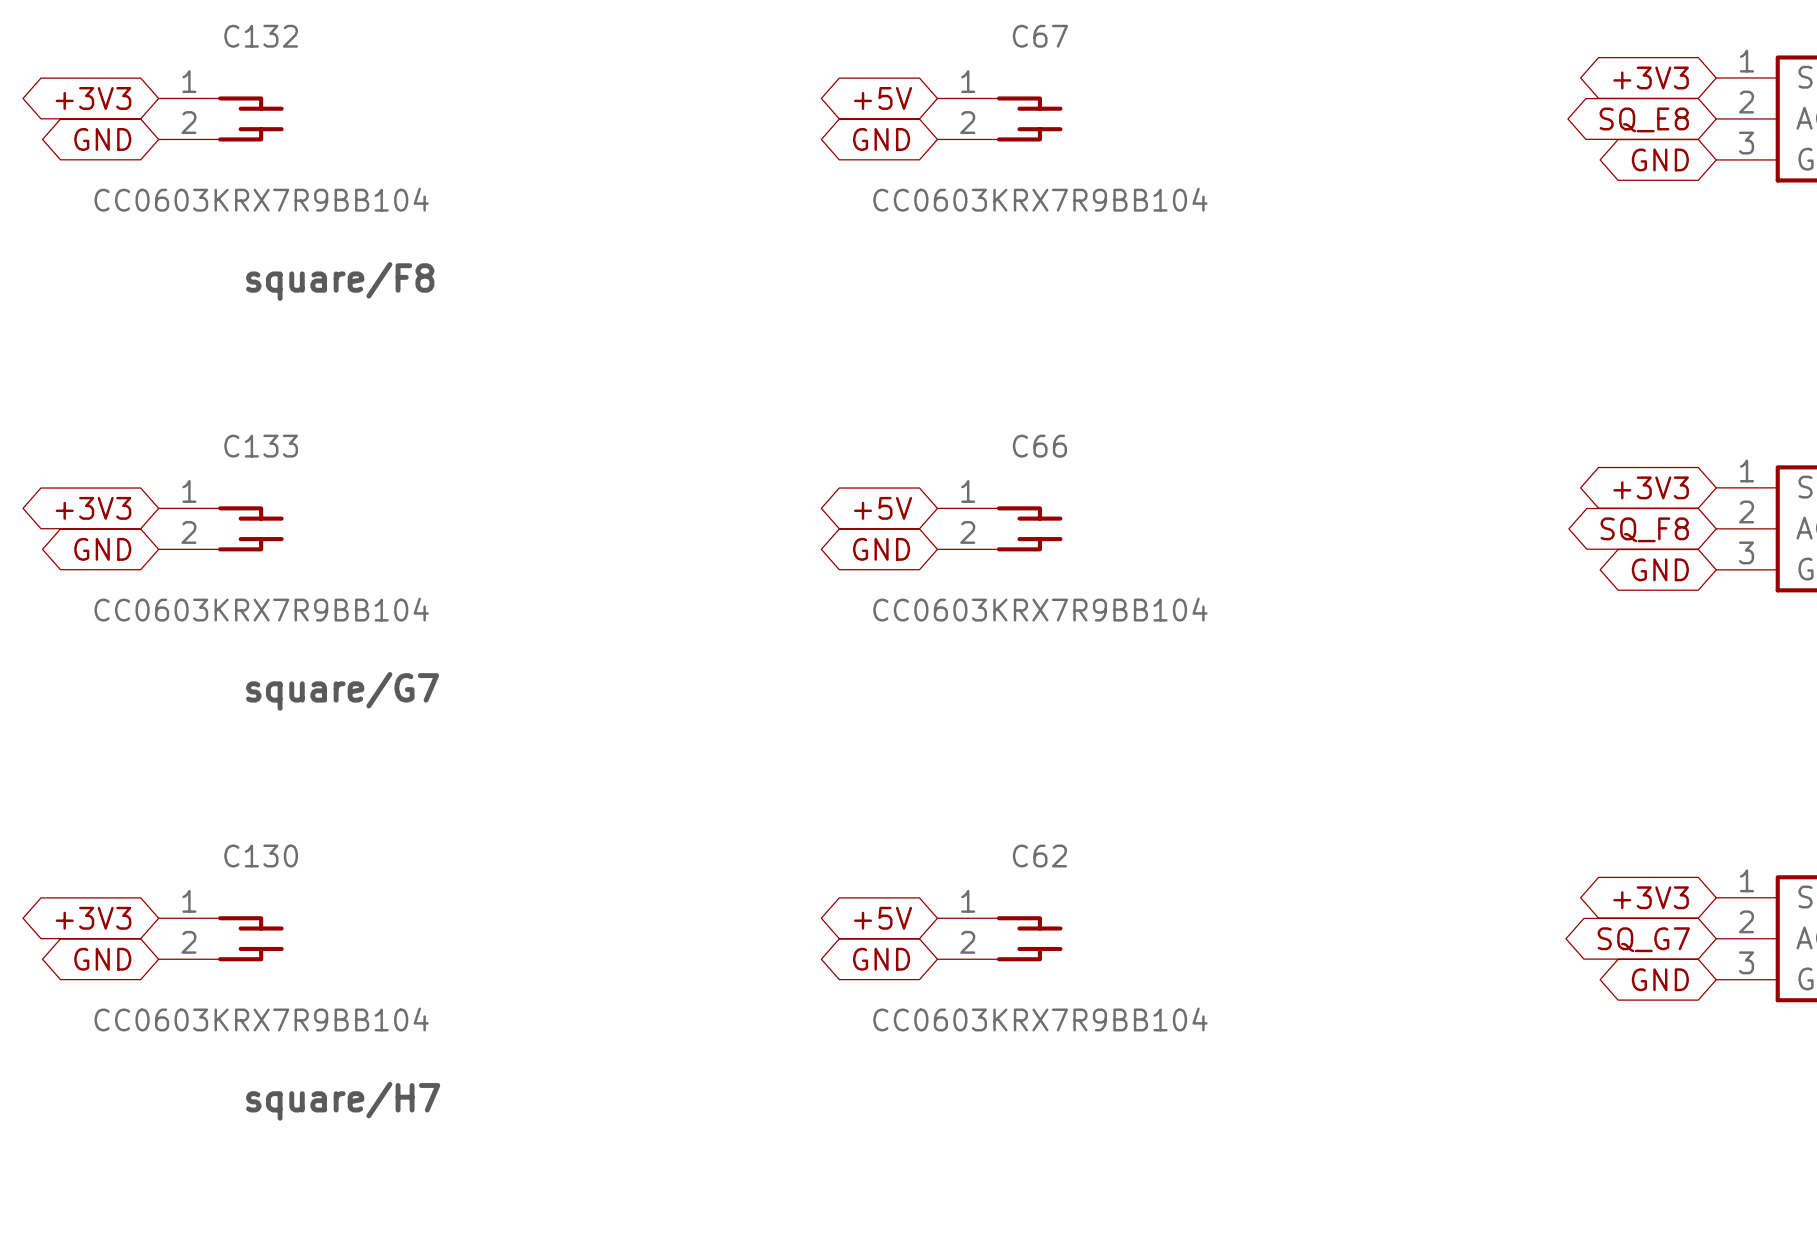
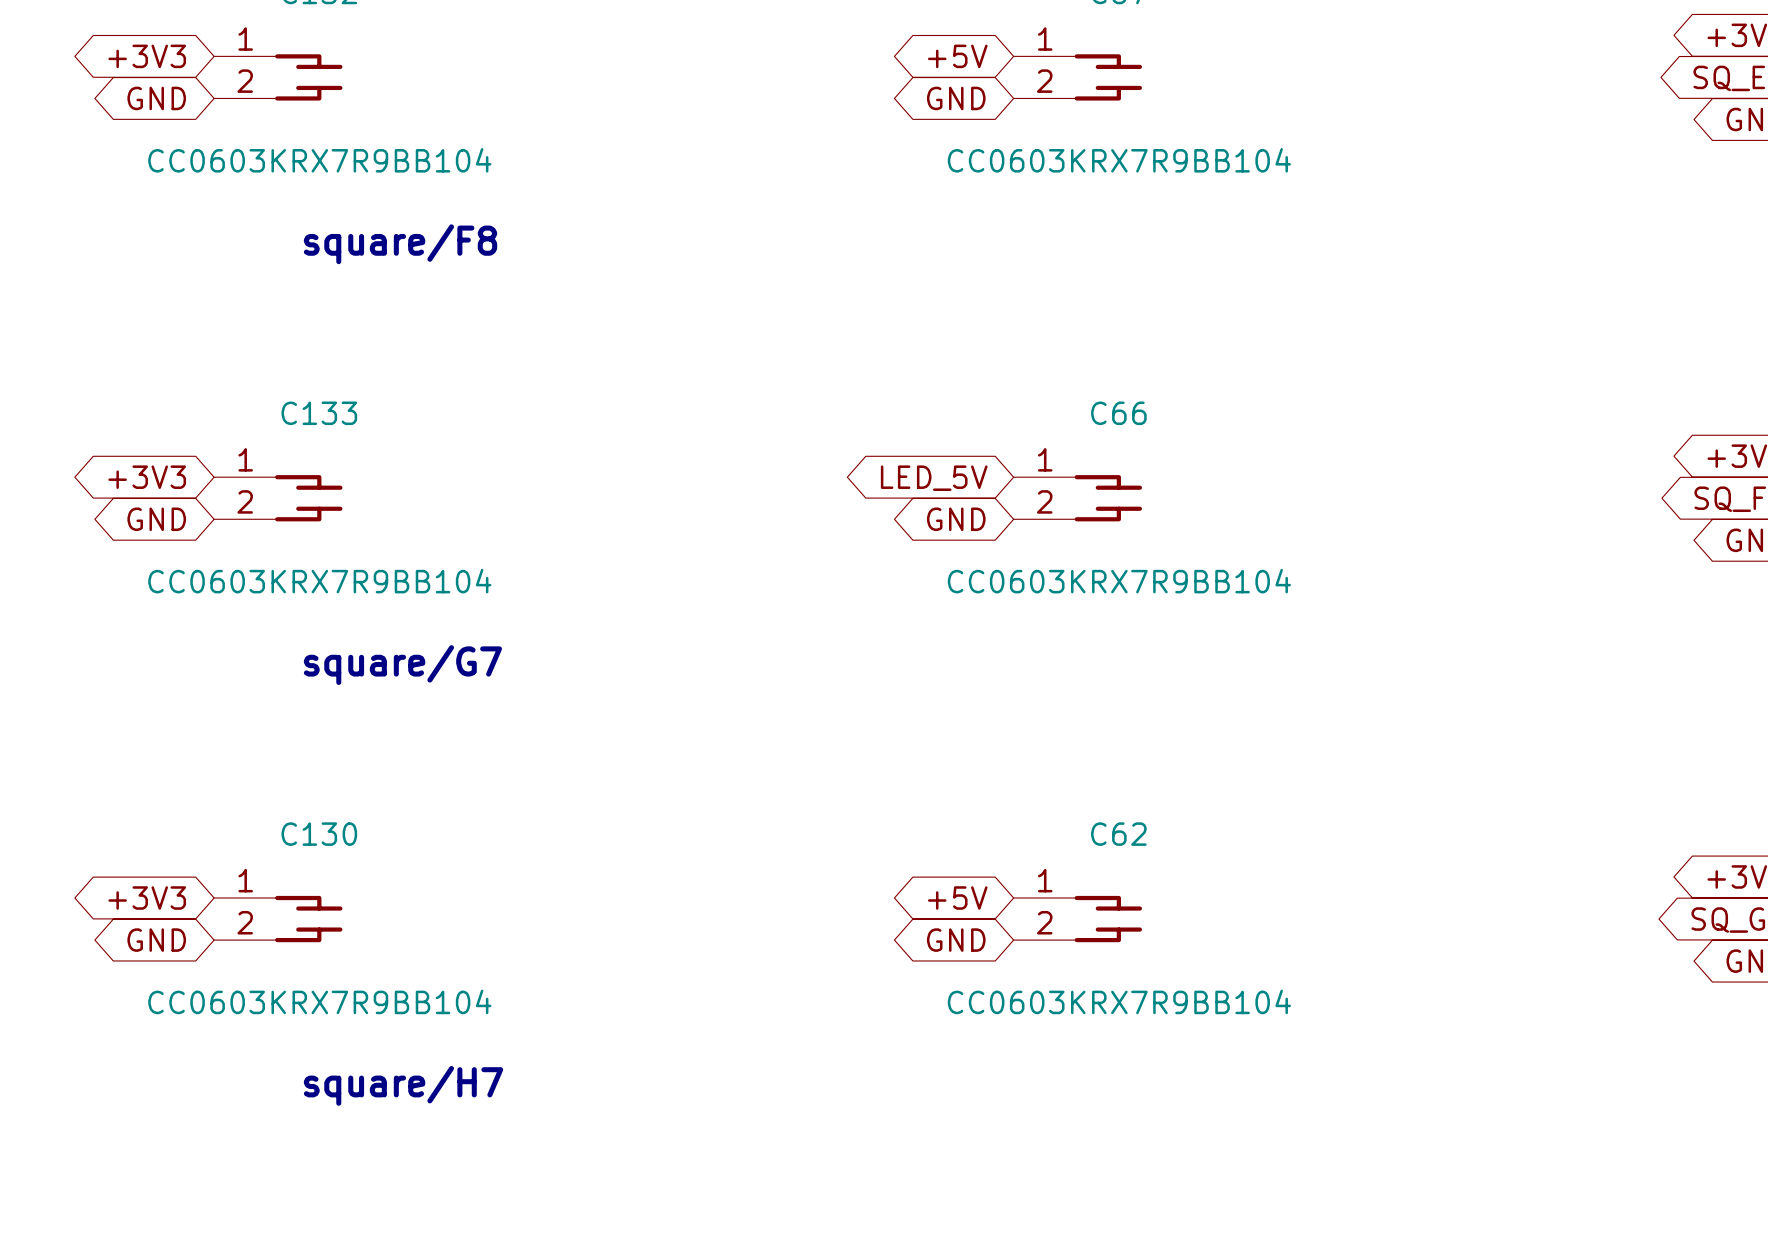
global label: +5V (883, 508) -> LED_5V (934, 478)

